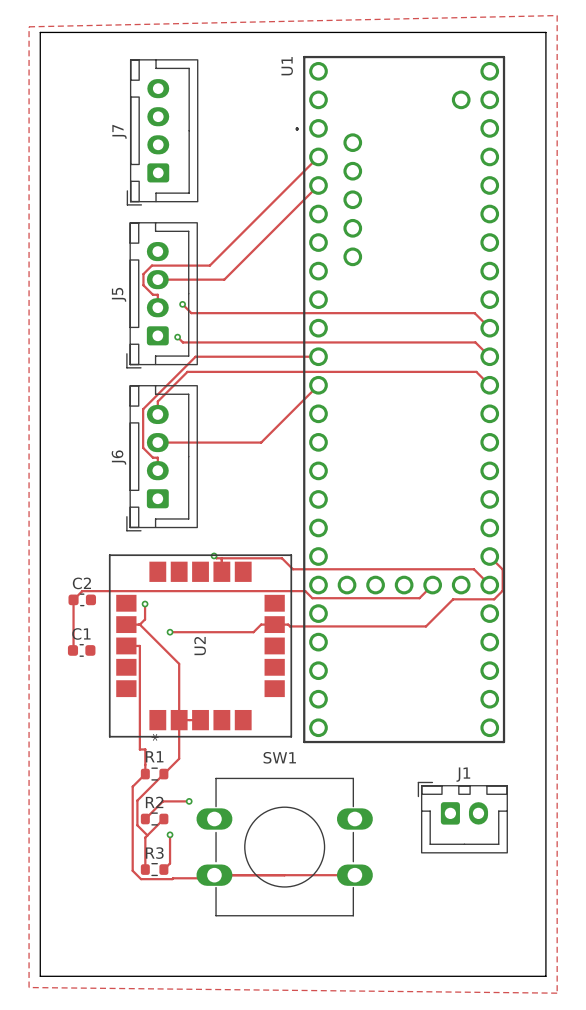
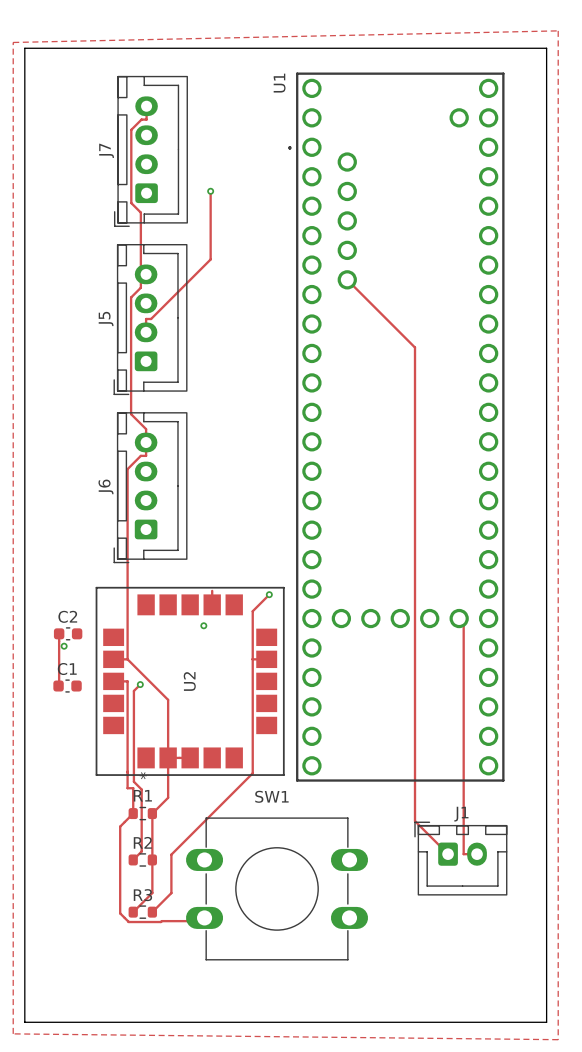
track: (318, 156) (209, 265) (151, 265) (143, 274) (143, 285) (152, 294) (157, 294) -> (210, 191) (210, 259) (151, 319) (146, 319)
via: none -> (210, 191)
track: (318, 185) (224, 279) (157, 279) -> none
track: none -> (347, 279) (415, 347) (415, 821) (448, 854)
track: (182, 304) (191, 313) (474, 313) (489, 328) -> none
via: (182, 304) -> none
track: (177, 337) (182, 342) (475, 342) (489, 356) -> none
via: (177, 337) -> none
track: (318, 356) (195, 356) (143, 409) (143, 447) (152, 457) (157, 457) (157, 470) -> none
track: (318, 385) (261, 442) (157, 442) -> none
track: (489, 385) (476, 371) (187, 371) (157, 401) -> (146, 106) (146, 119) (141, 119) (131, 129) (131, 203) (140, 212) (140, 287) (131, 297) (131, 414) (146, 429)
track: (214, 555) (216, 558) (281, 558) (292, 569) (473, 569) (489, 585) -> none
via: (214, 555) -> none
track: (489, 556) (502, 569) (502, 590) (494, 599) (453, 599) (426, 626) (290, 626) (288, 624) (274, 624) -> none
via: none -> (269, 594)
track: (432, 585) (419, 598) (312, 598) (305, 591) (82, 591) (73, 599) -> none
track: none -> (459, 618) (463, 623) (463, 854) (477, 854)
via: none -> (203, 625)
track: (145, 604) (145, 619) (139, 624) -> (146, 442) (146, 455) (140, 455) (127, 469) (127, 659)
via: (145, 604) -> none
via: none -> (64, 646)
track: (261, 624) (253, 632) (170, 632) -> none
via: (170, 632) -> none
via: none -> (140, 684)
track: (163, 774) (137, 800) (137, 825) (147, 835) -> (152, 813) (152, 893) (133, 912)
track: (189, 801) (162, 801) (153, 810) -> (140, 684) (133, 690) (133, 781) (141, 789) (141, 851)
via: (189, 801) -> none
track: (163, 818) (145, 837) (145, 869) -> none
track: (170, 834) (170, 863) -> (269, 594) (252, 611) (252, 773) (171, 854) (171, 893) (158, 905)
via: (170, 834) -> none
track: (214, 875) (354, 875) -> none

